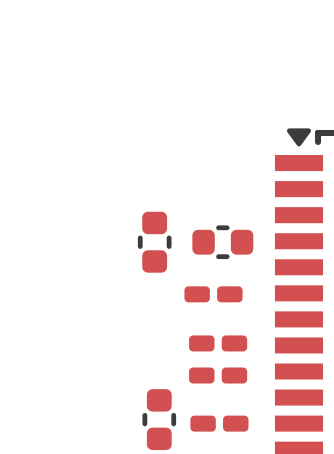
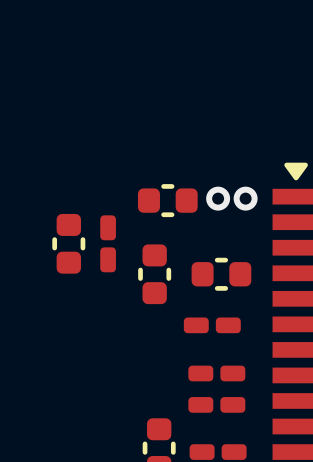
via: none -> (218, 198)
via: none -> (245, 198)
part: none -> (167, 200)
part: none -> (68, 243)
part: none -> (108, 243)

